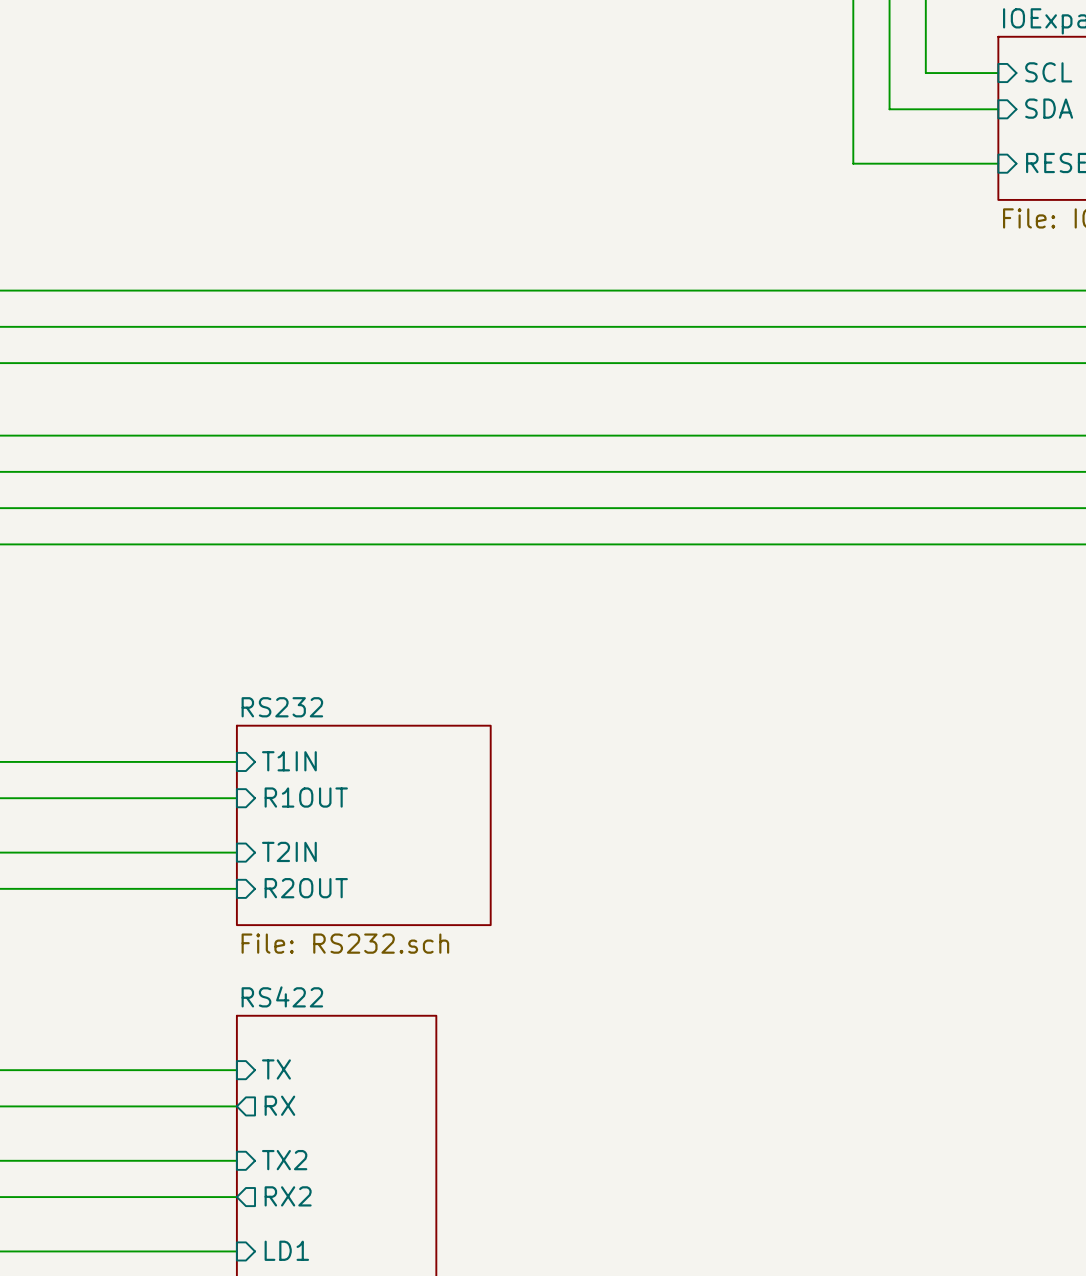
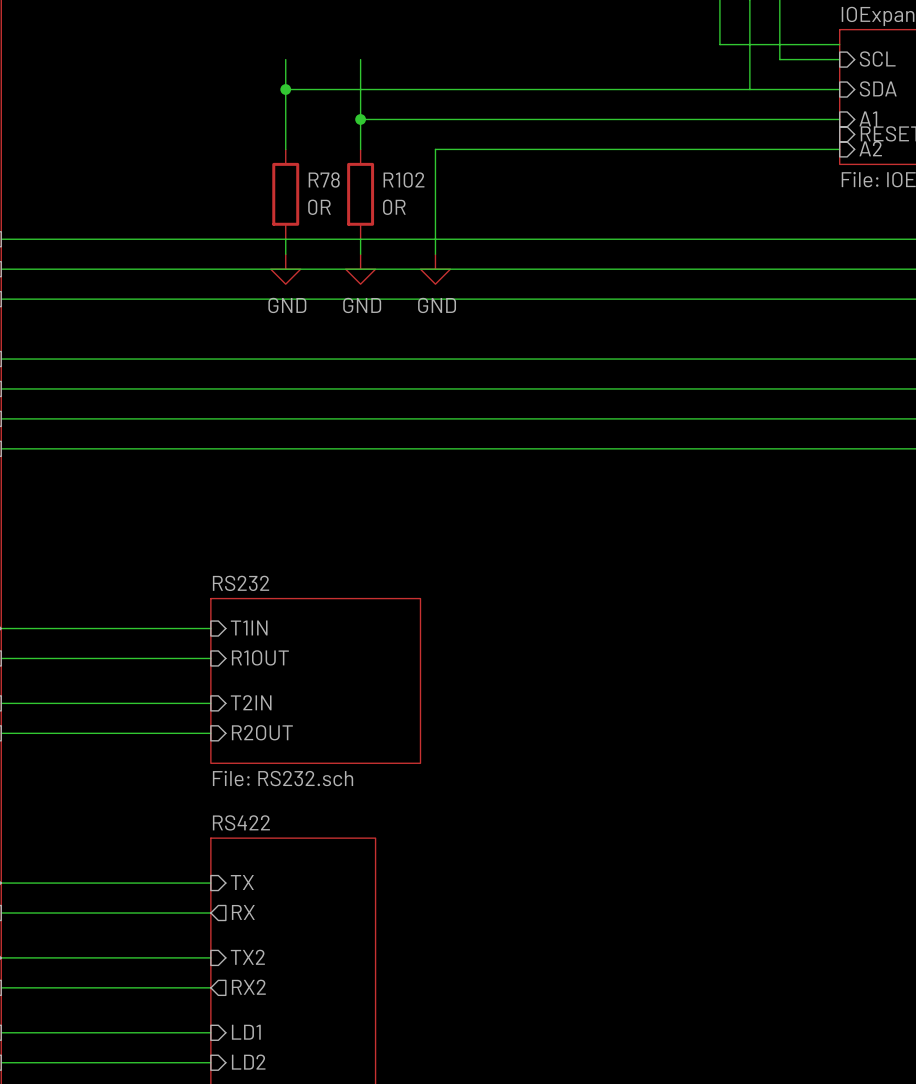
wire: (853, 54) (853, 163) (998, 163) -> (719, 44) (839, 44)
wire: none -> (285, 59) (285, 149)
wire: none -> (360, 59) (360, 149)
wire: none -> (285, 89) (749, 89)
junction: none -> (285, 89)
sheet pin: none -> A1 (868, 118)
wire: none -> (360, 119) (839, 119)
junction: none -> (360, 119)
wire: none -> (839, 149) (435, 149) (435, 254)
sheet pin: none -> A2 (870, 148)
R78: none -> 0R (285, 194)
R102: none -> 0R (360, 194)
wire: none -> (285, 239) (285, 254)
wire: none -> (360, 239) (360, 254)
power symbol: none -> GND (285, 269)
power symbol: none -> GND (360, 269)
power symbol: none -> GND (435, 269)

